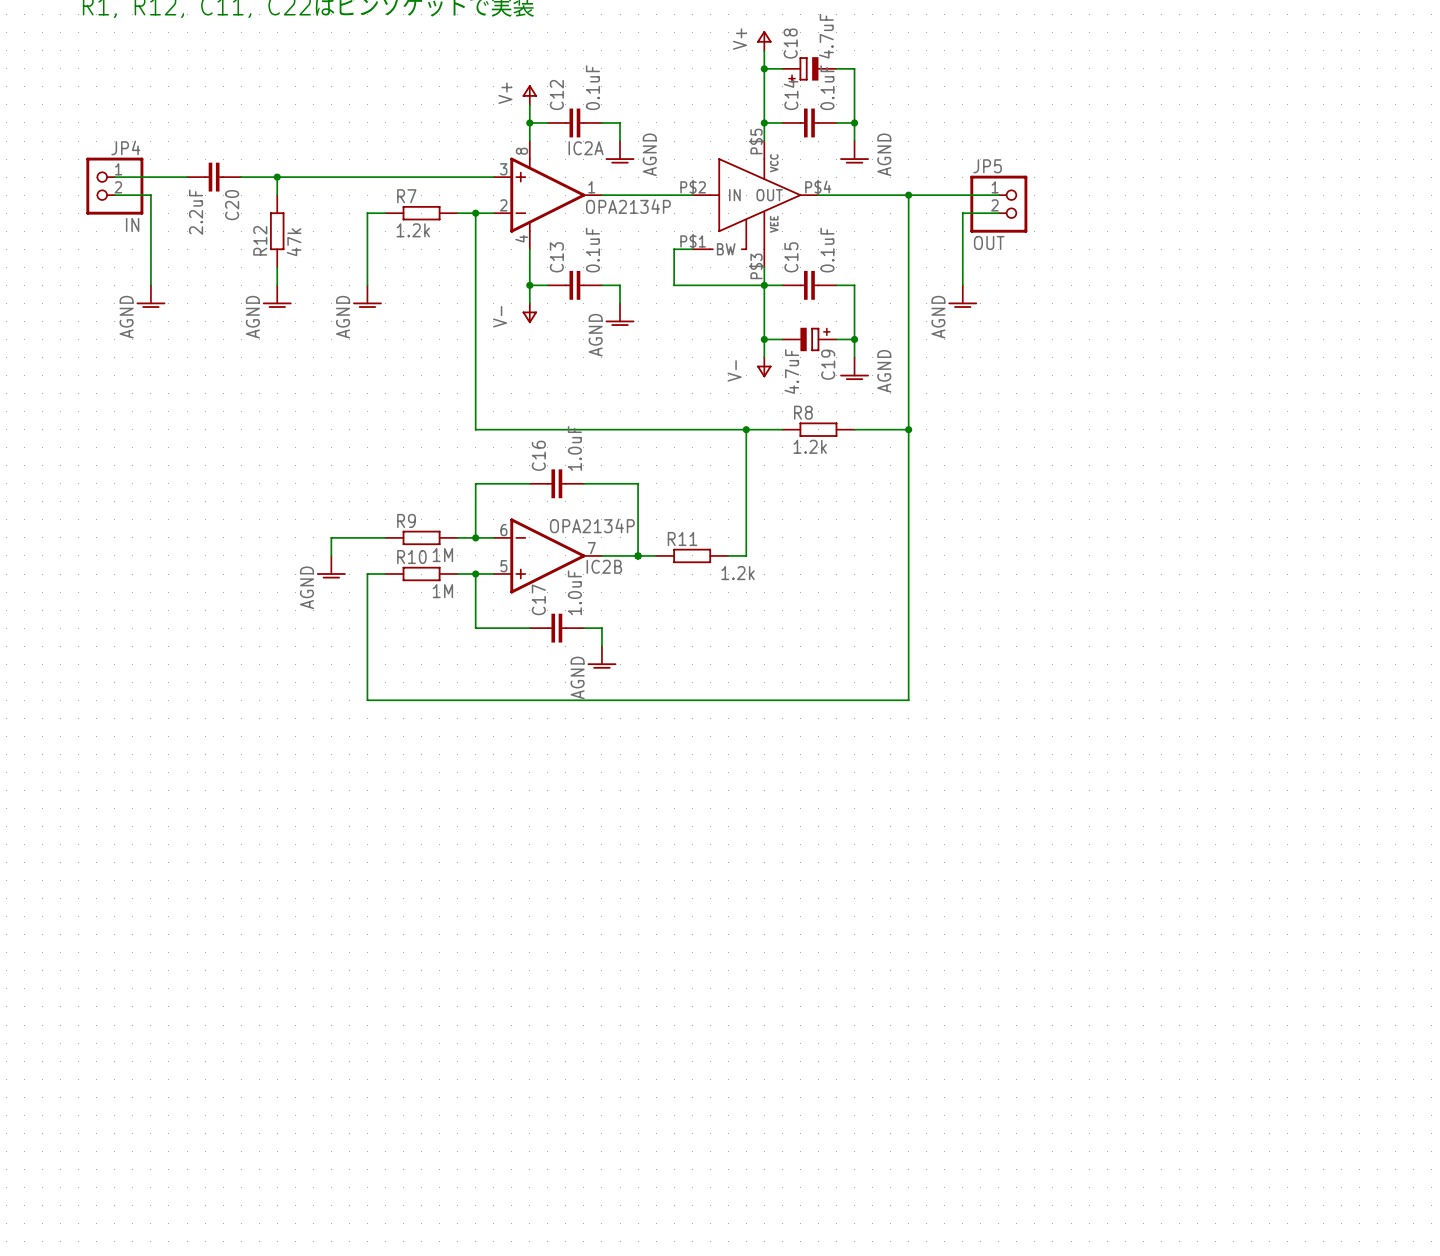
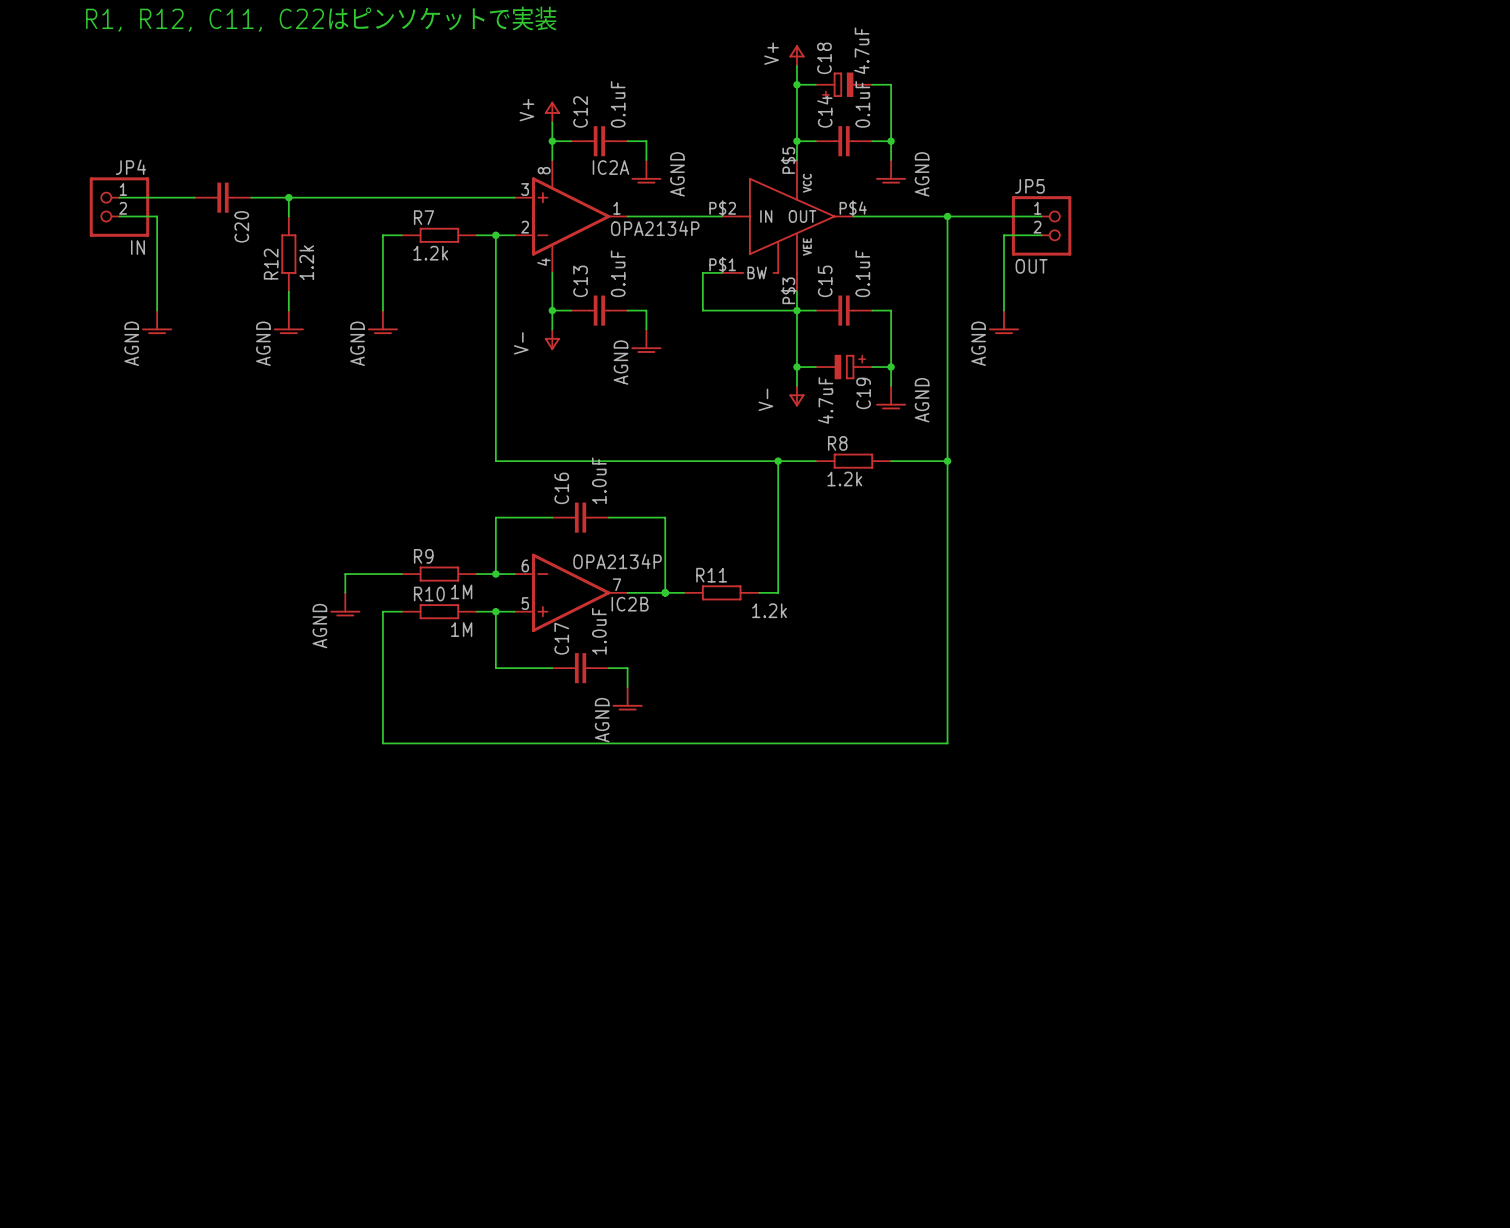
C20 value: 2.2uF (196, 212) -> none
R12 value: 47k (294, 242) -> 1.2k (306, 262)

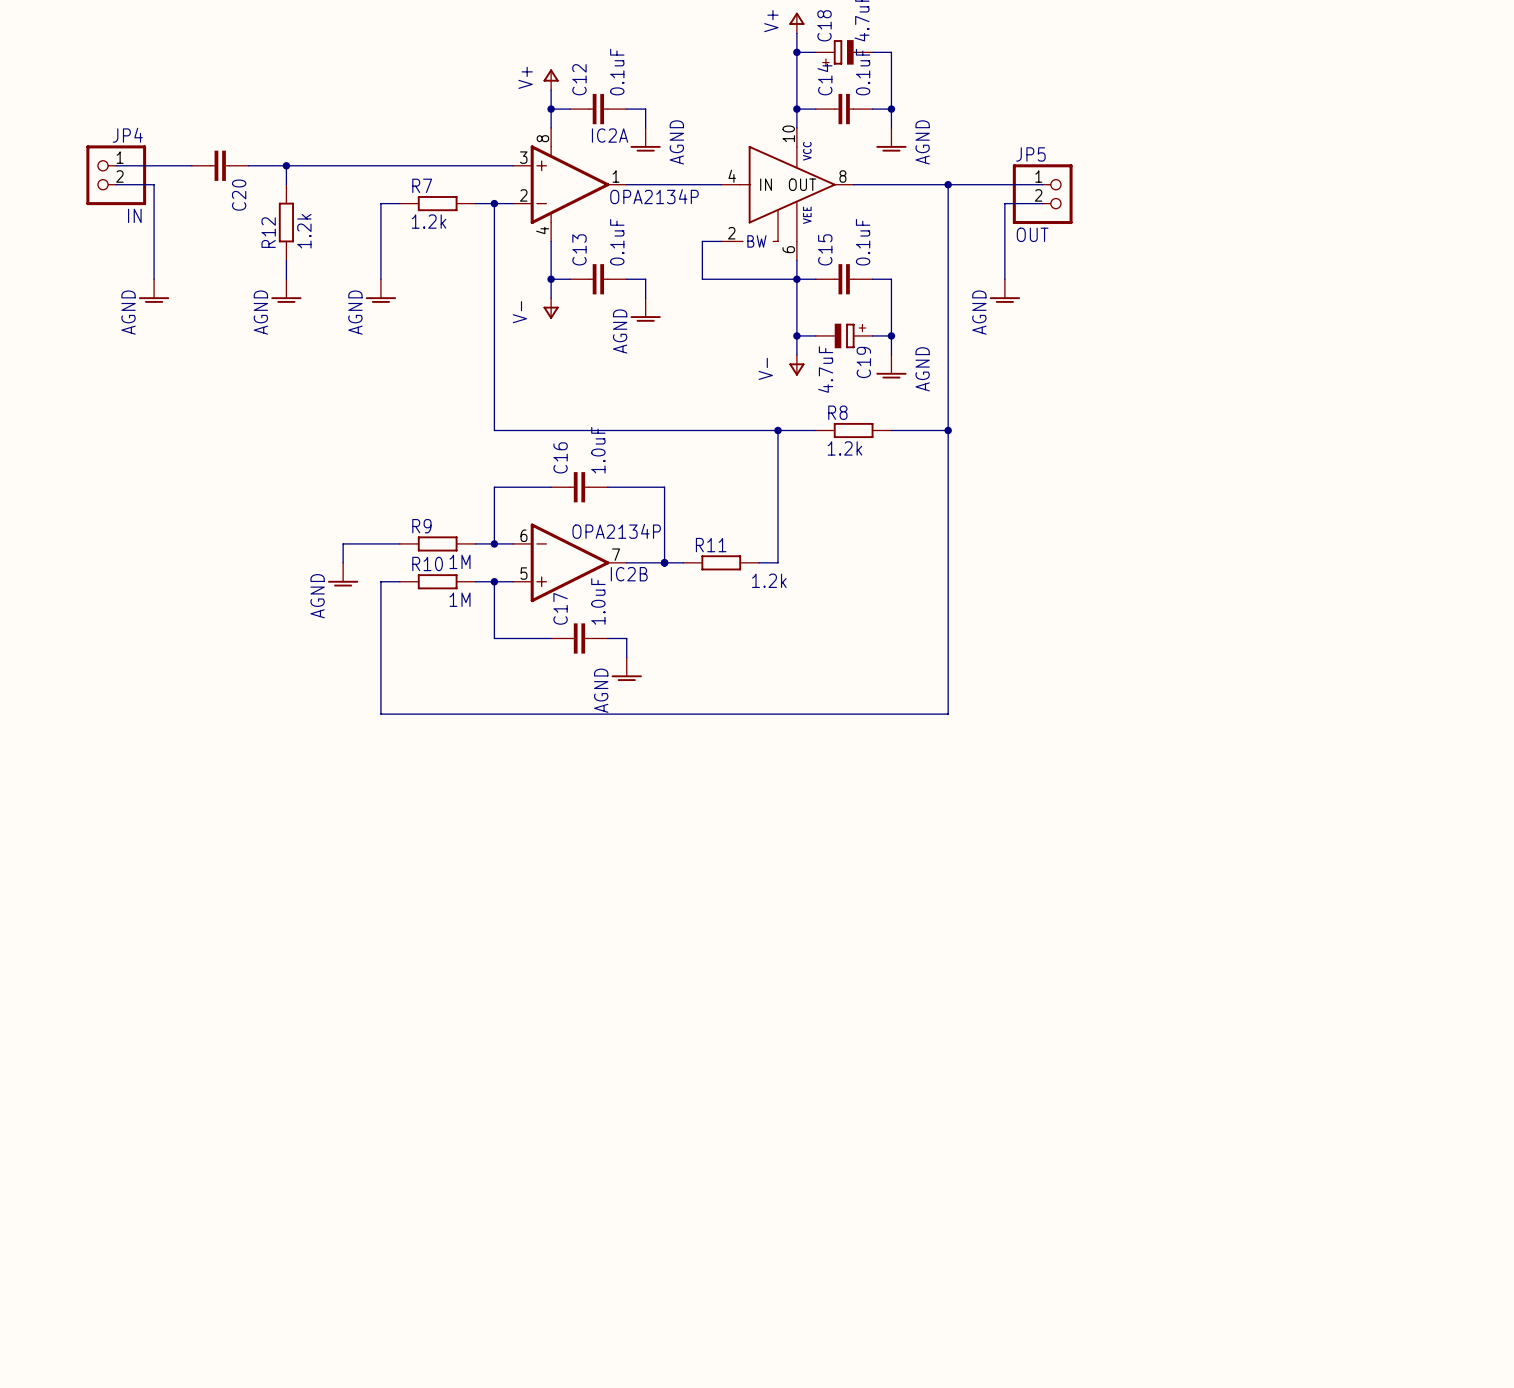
part pin number: P$5 (788, 160) -> 10 (788, 133)
part pin number: P$2 (722, 208) -> 4 (732, 176)
part pin number: P$4 (853, 208) -> 8 (842, 176)
part pin number: P$1 (722, 264) -> 2 (731, 233)
part pin number: P$3 (788, 290) -> 6 (788, 249)

